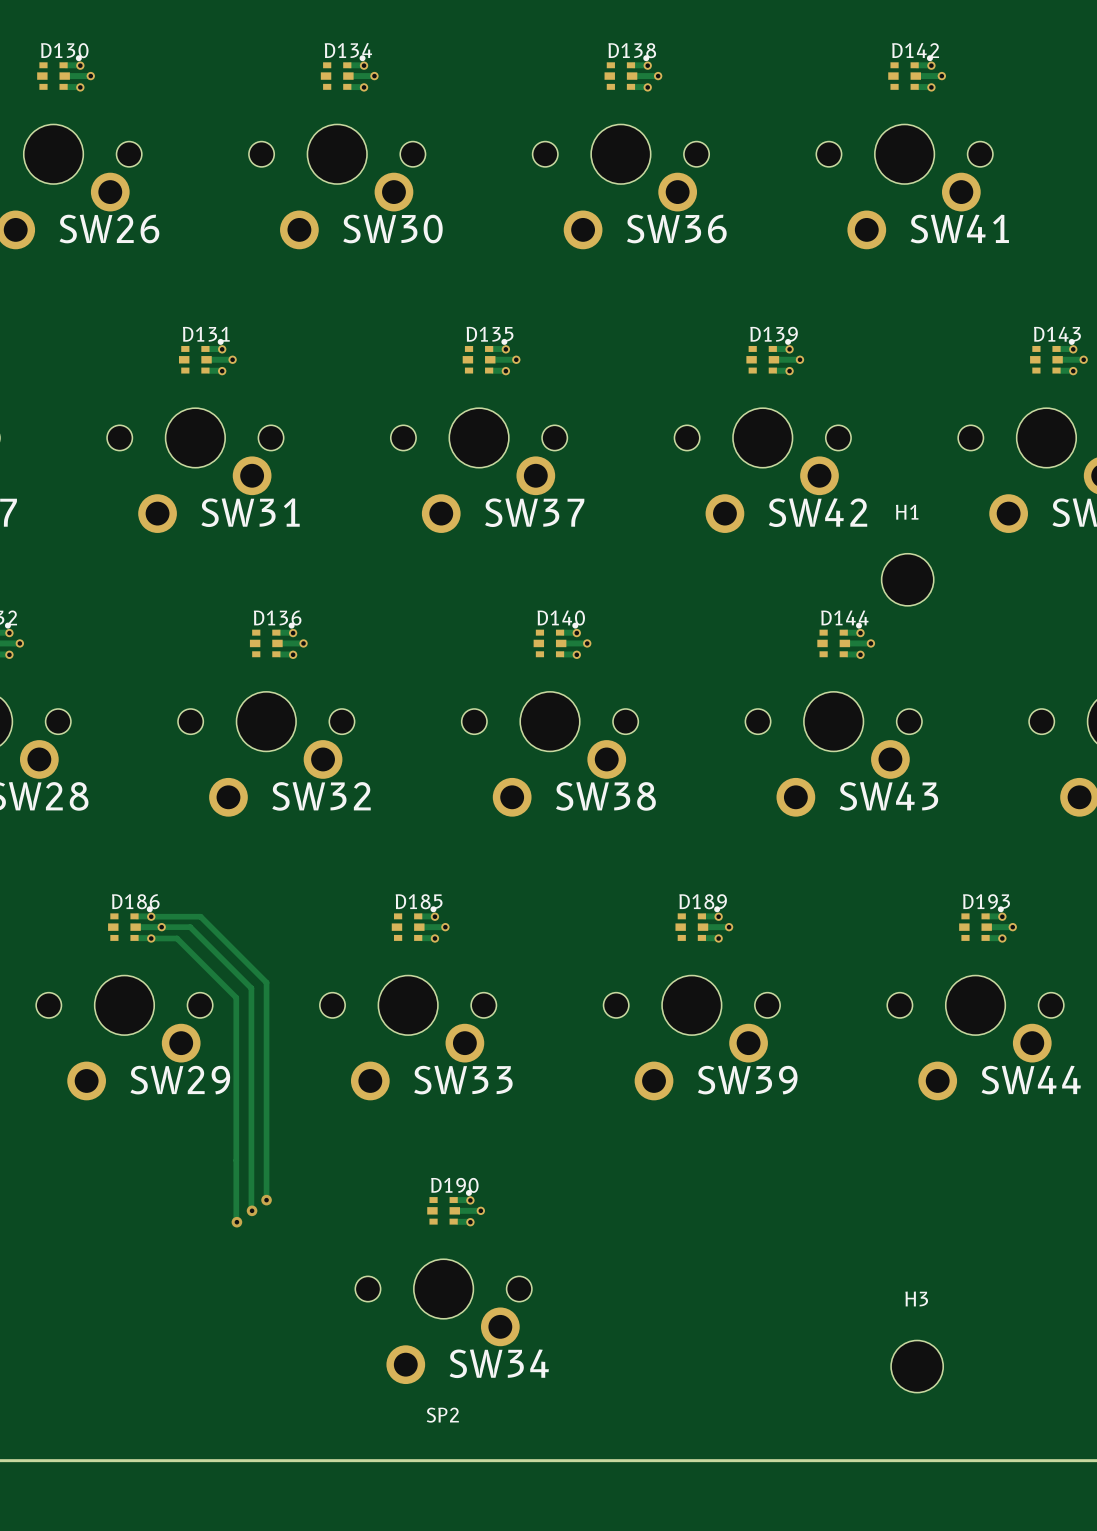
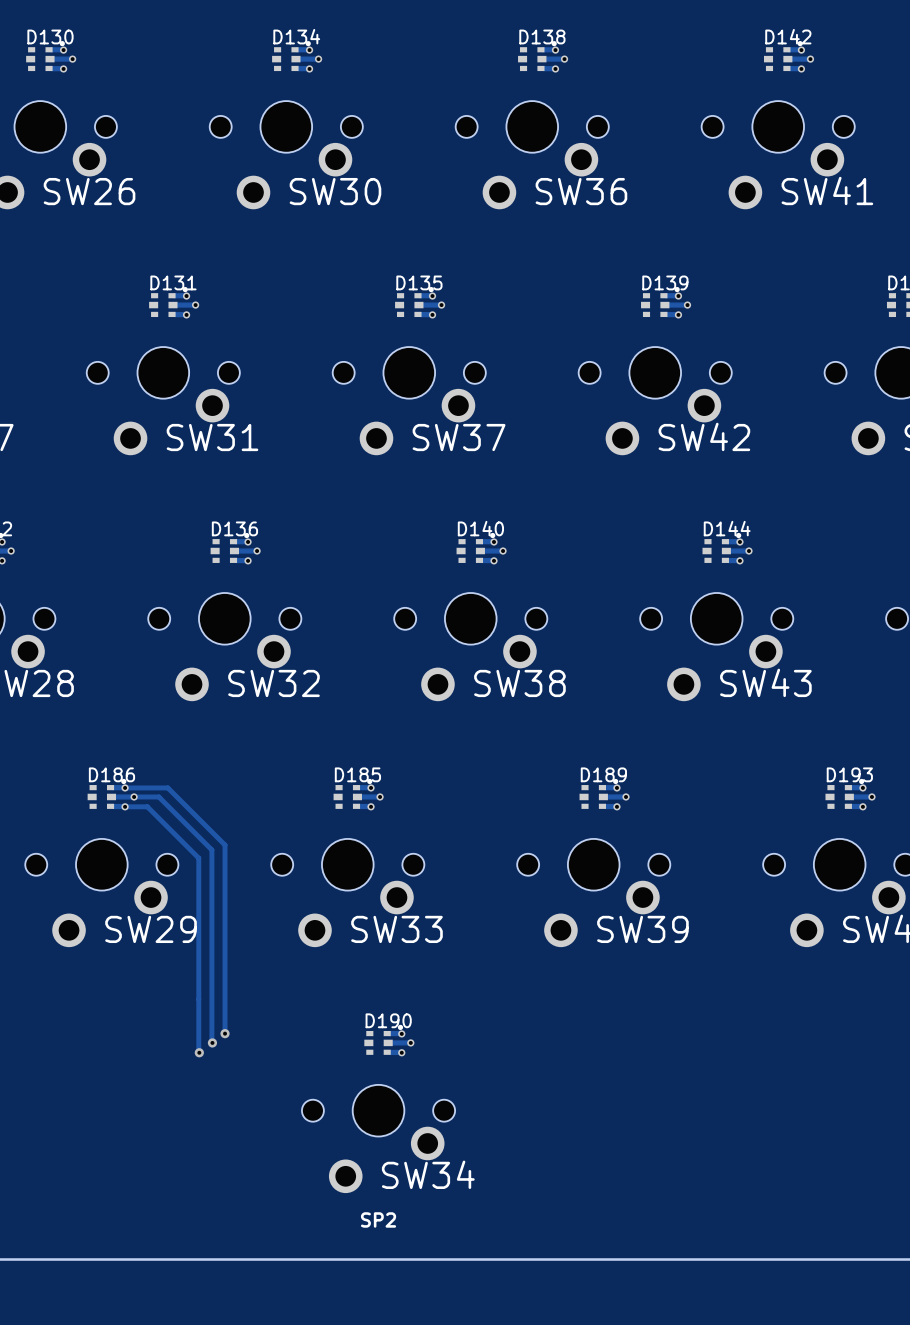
H1: (907, 579) -> none
H3: (917, 1366) -> none

